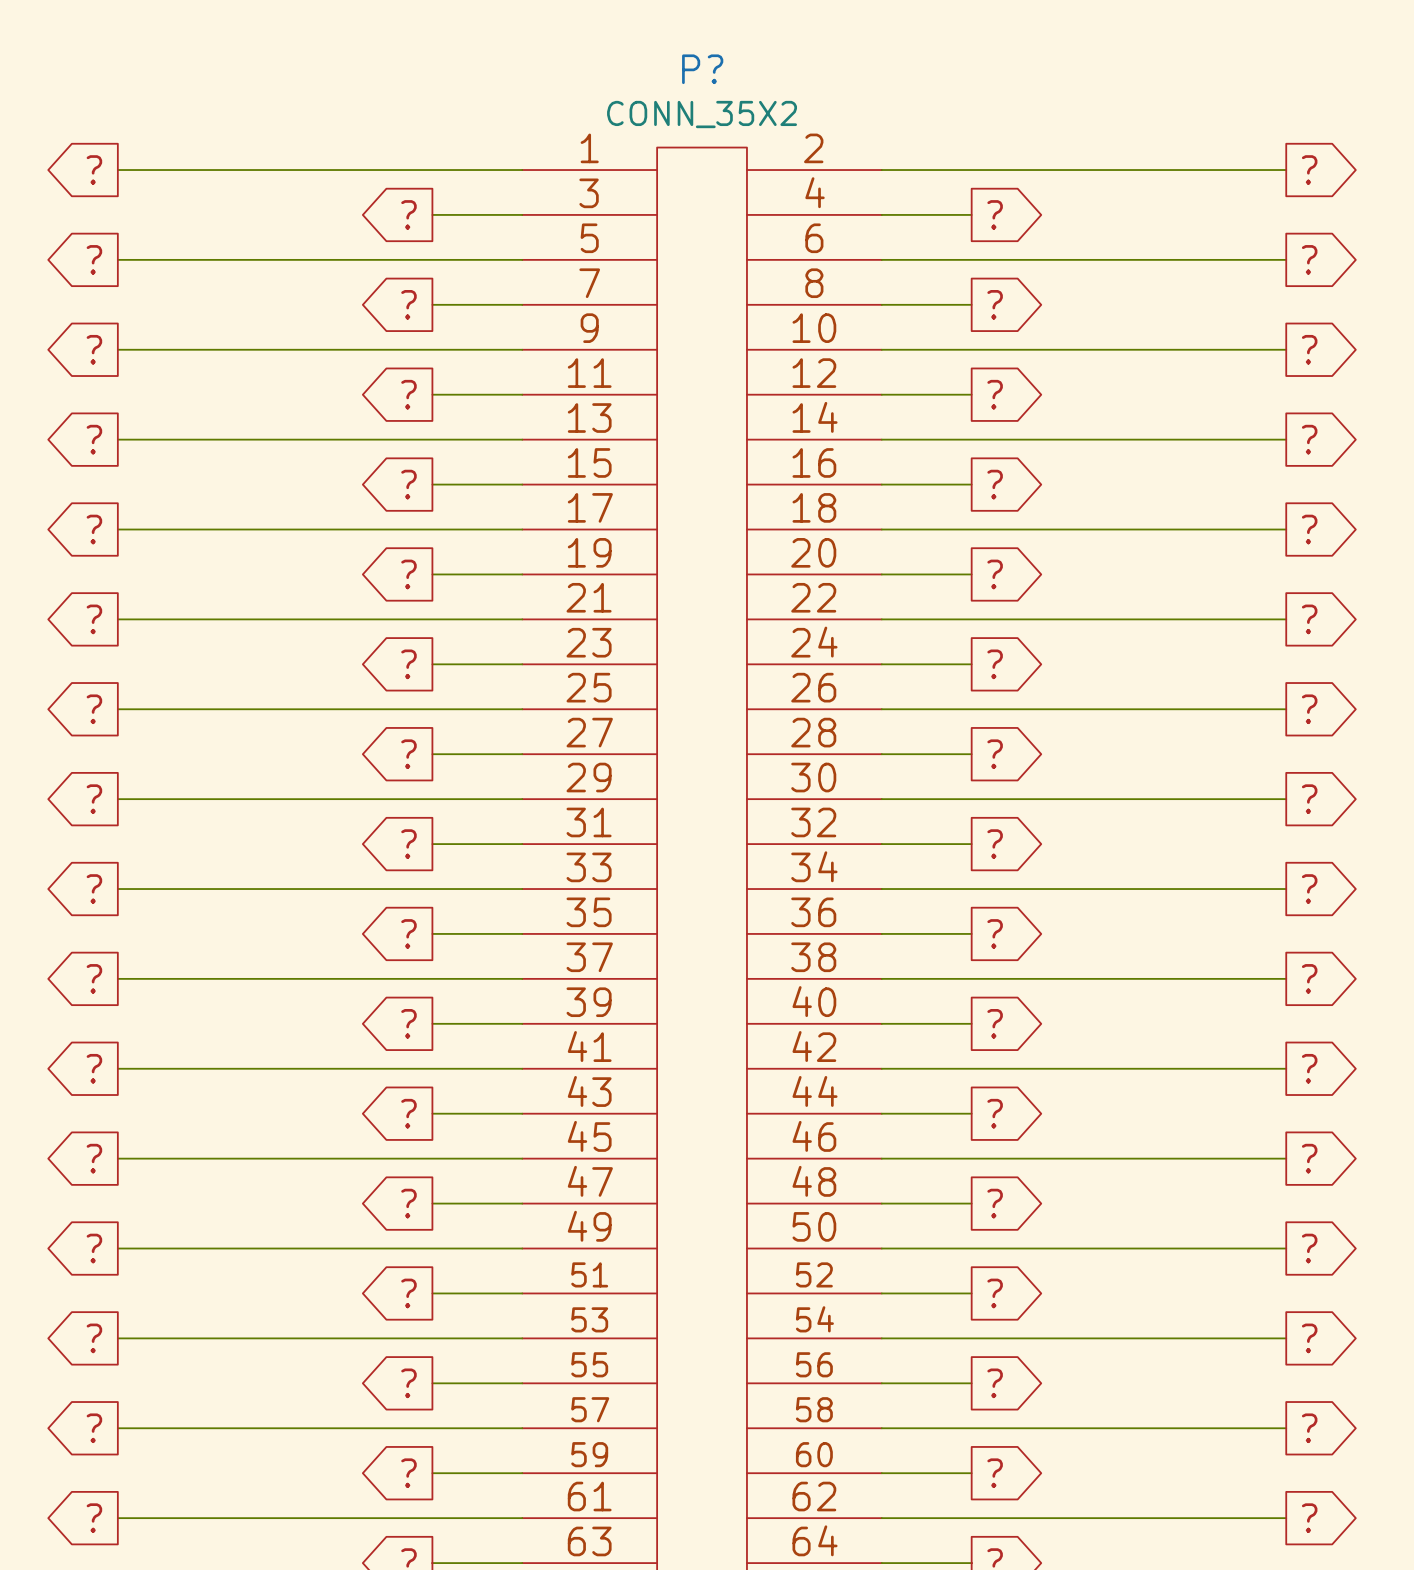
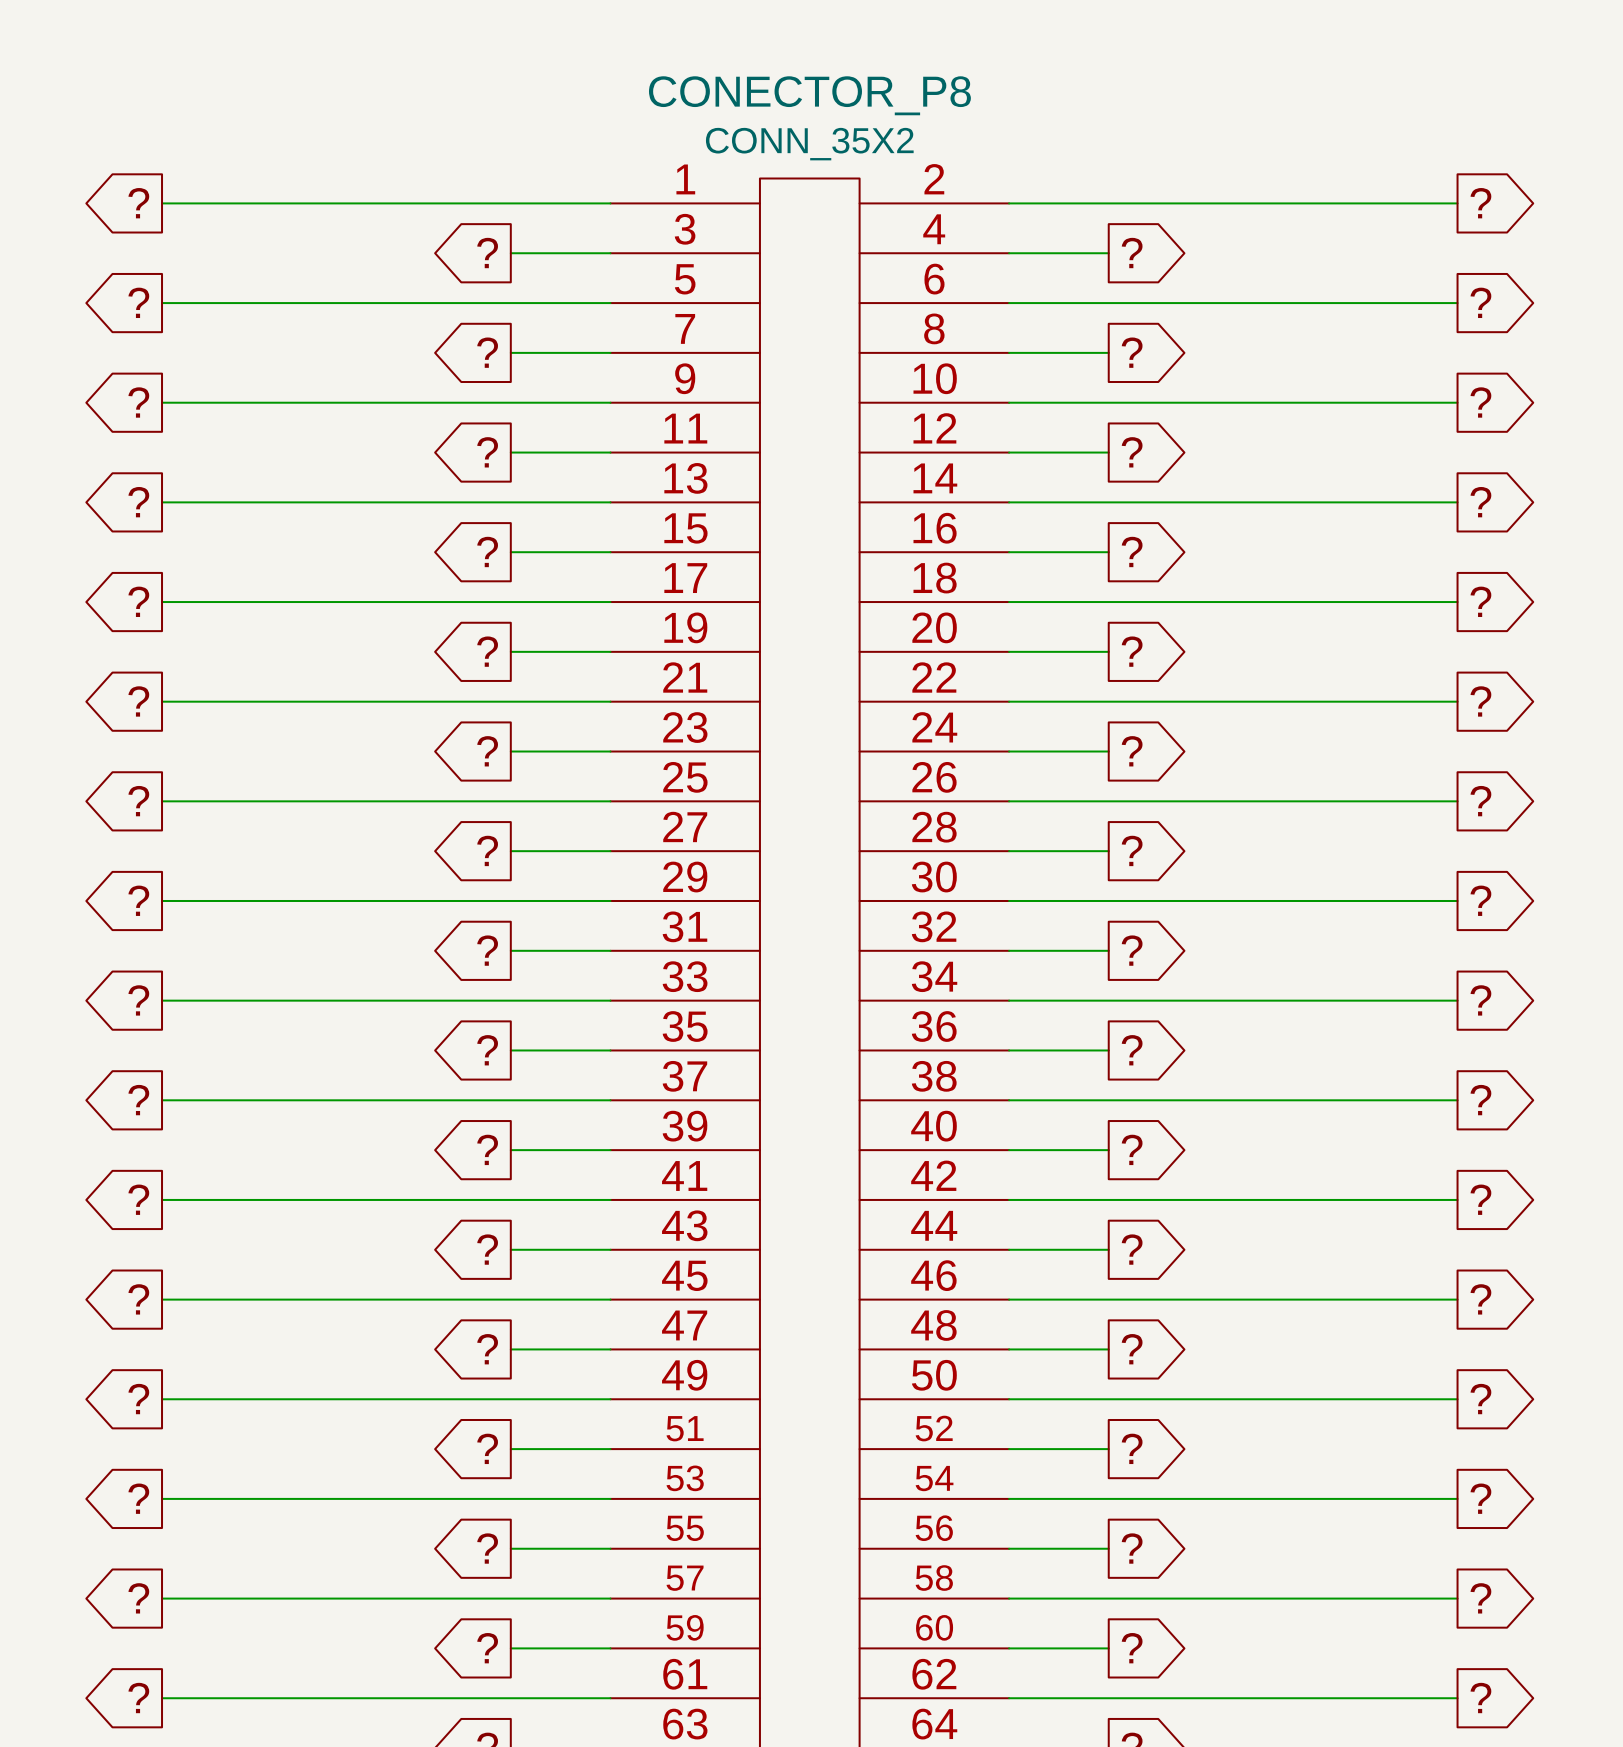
P? name: P? (702, 69) -> CONECTOR_P8 (809, 95)

